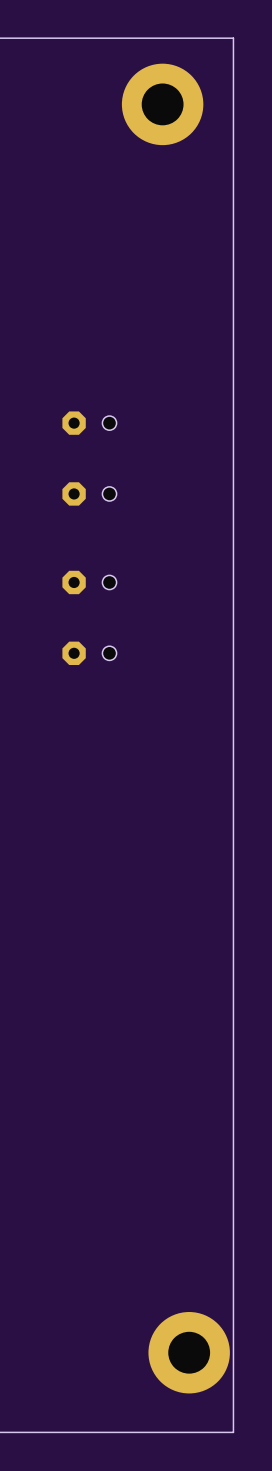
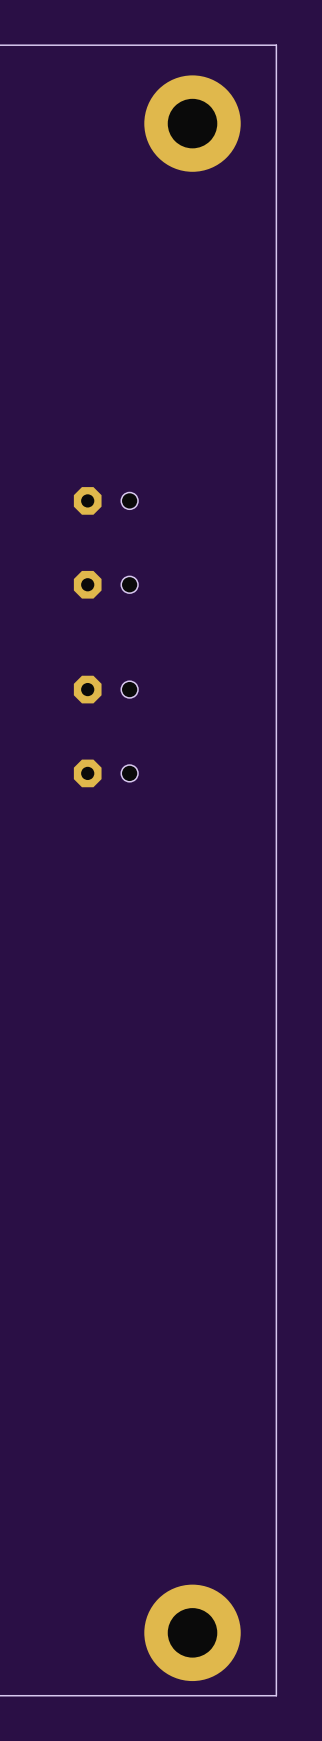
part position: (189, 1352) -> (192, 1632)

